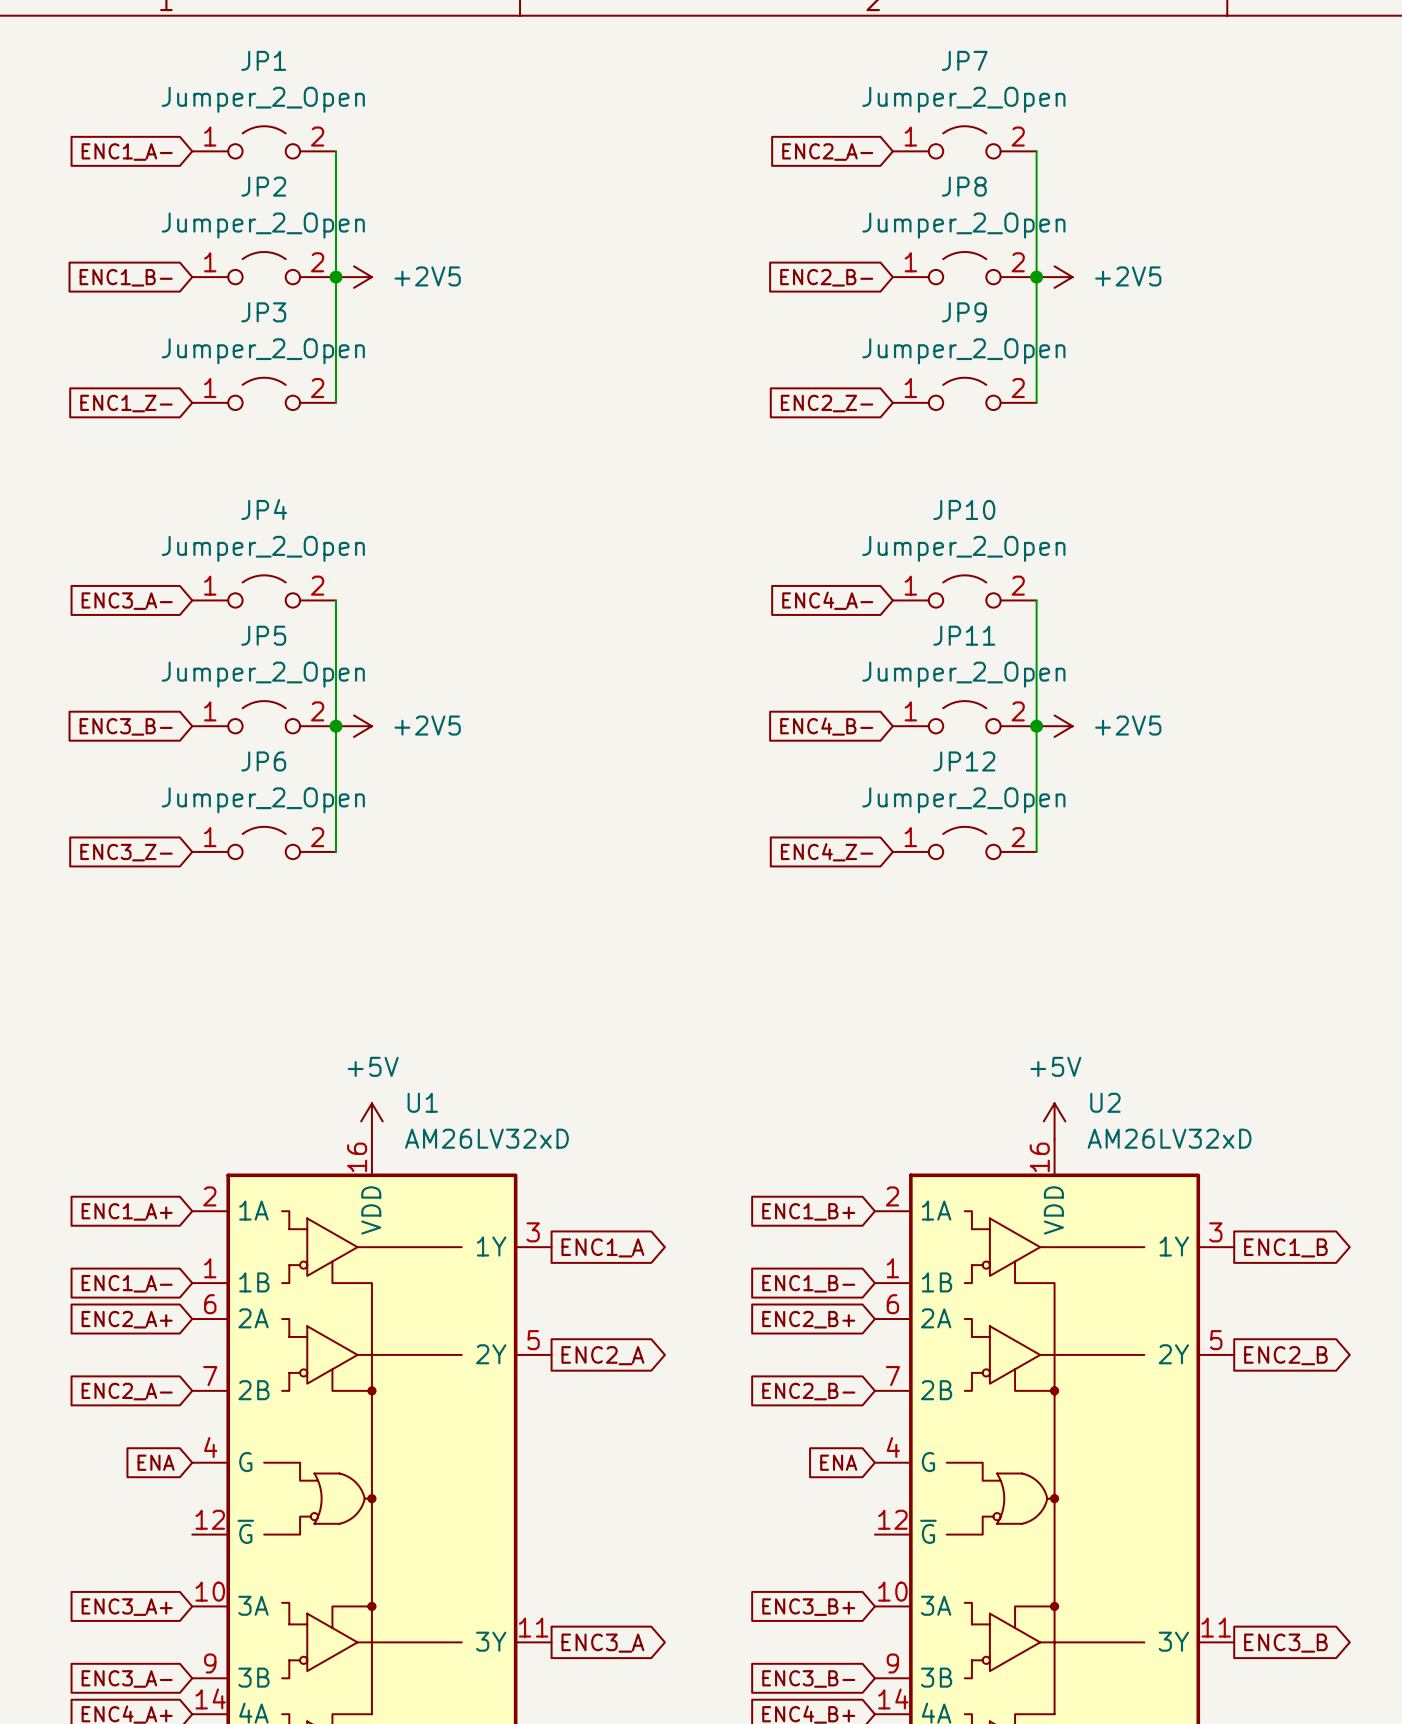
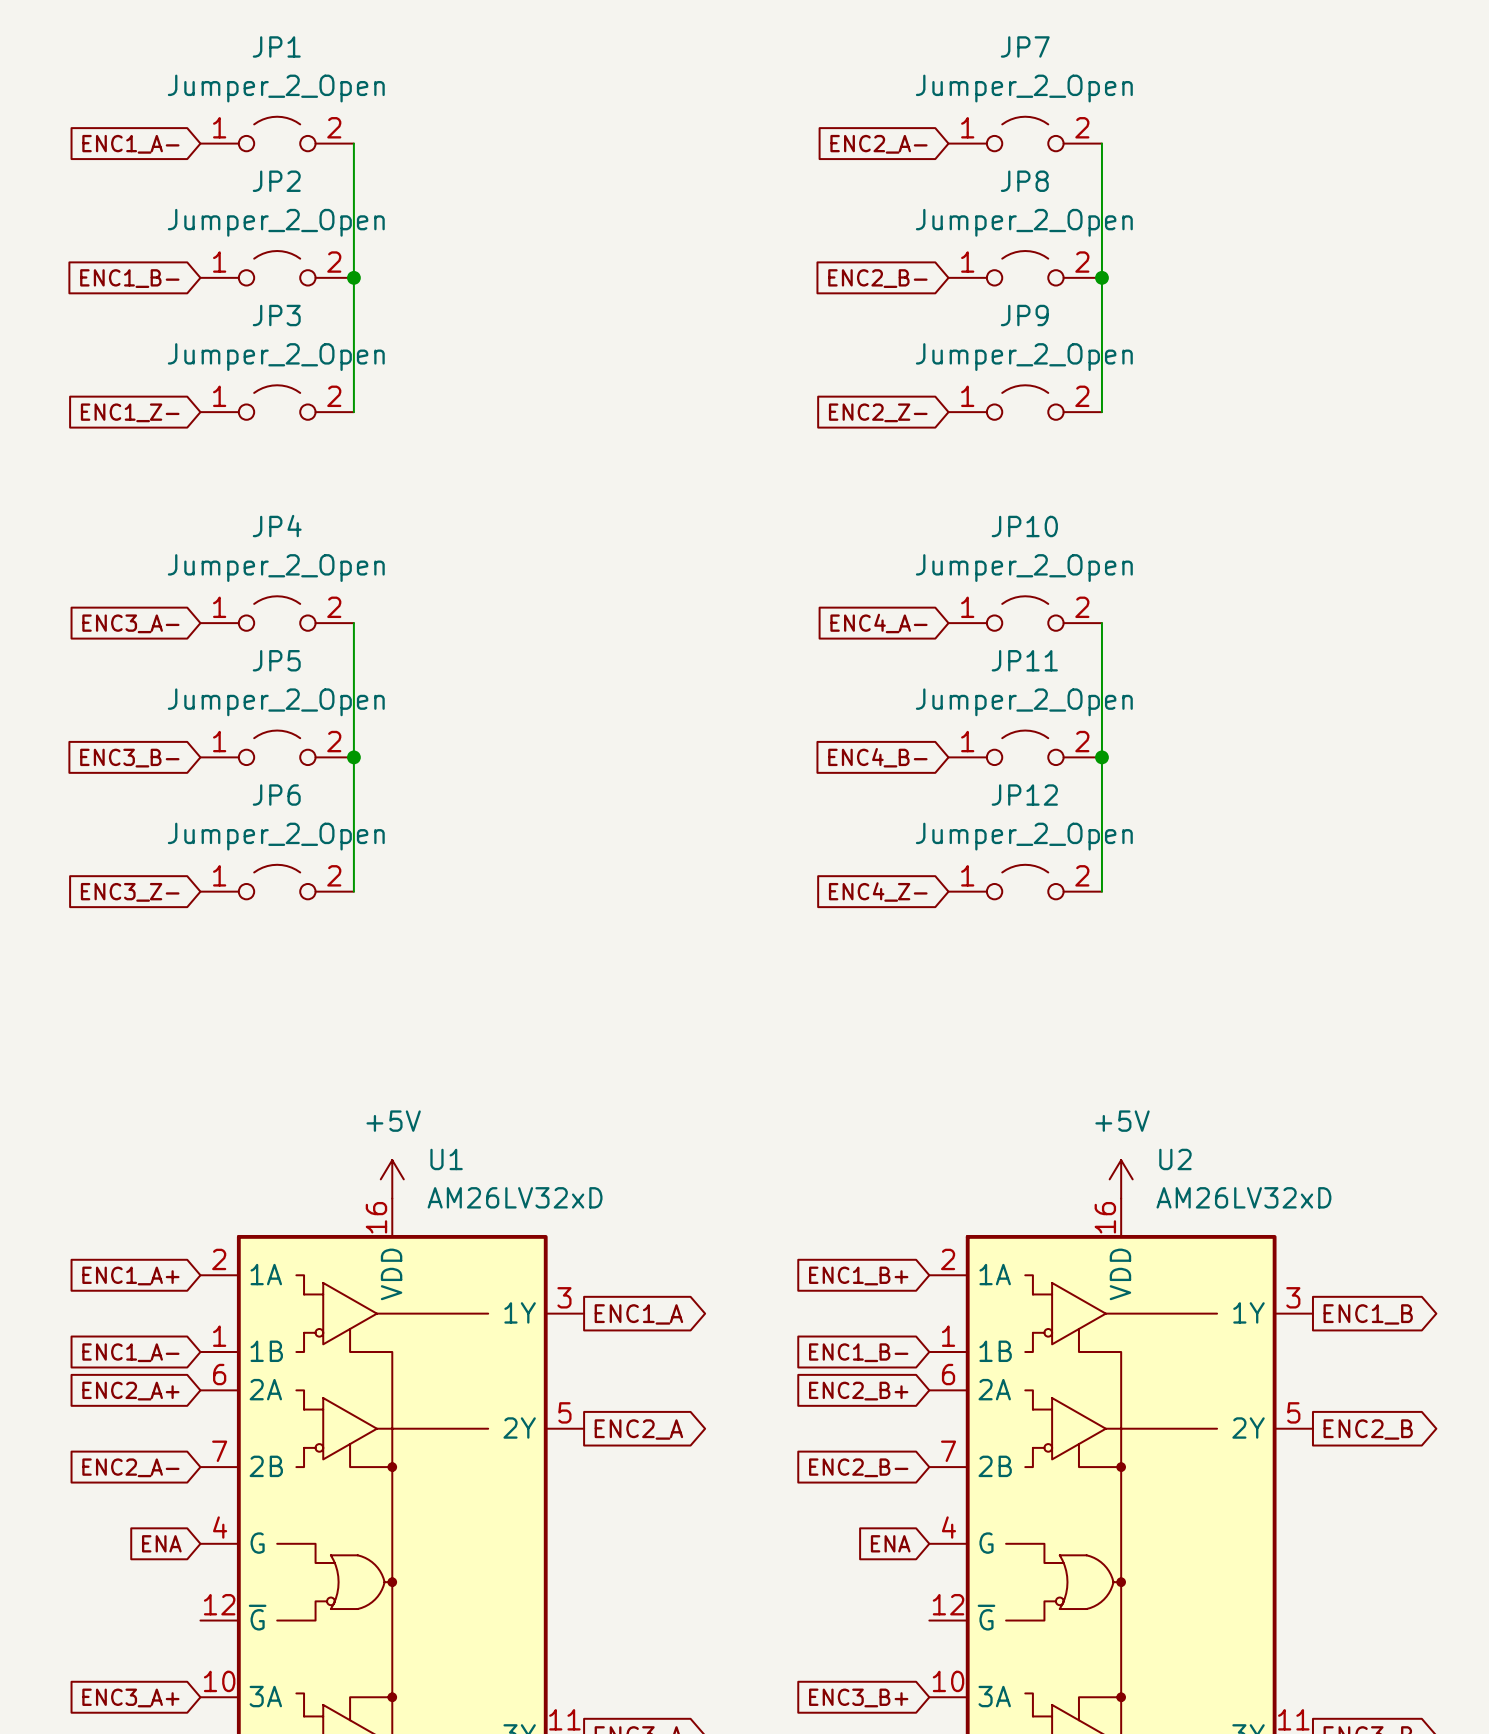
power symbol: +2V5 (353, 277) -> none
power symbol: +2V5 (1054, 277) -> none
power symbol: +2V5 (353, 726) -> none
power symbol: +2V5 (1054, 726) -> none

